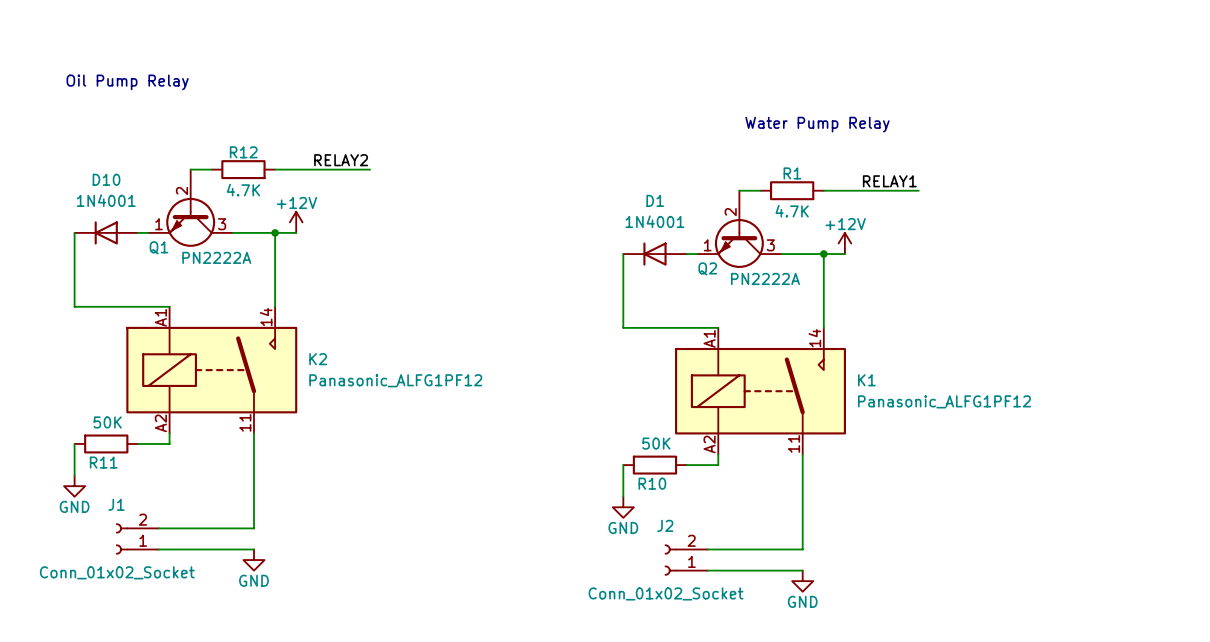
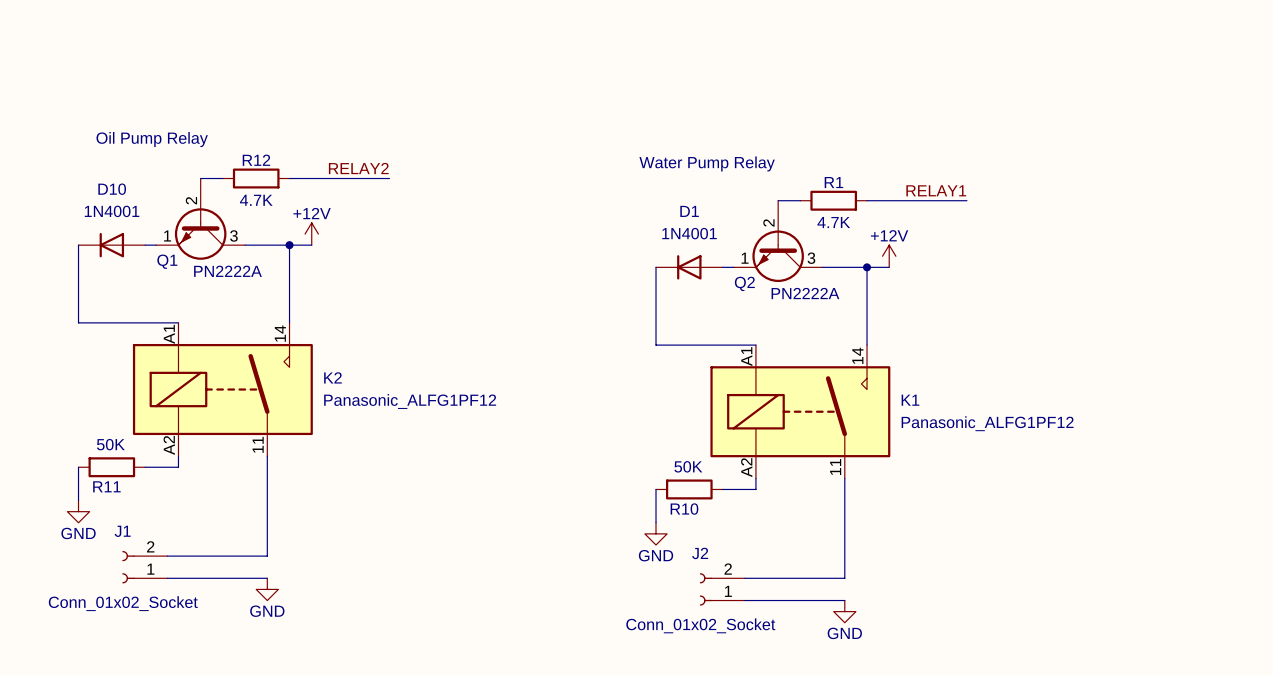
text position: Oil Pump Relay (127, 82) -> Oil Pump Relay (152, 139)
text position: Water Pump Relay (817, 124) -> Water Pump Relay (707, 163)

